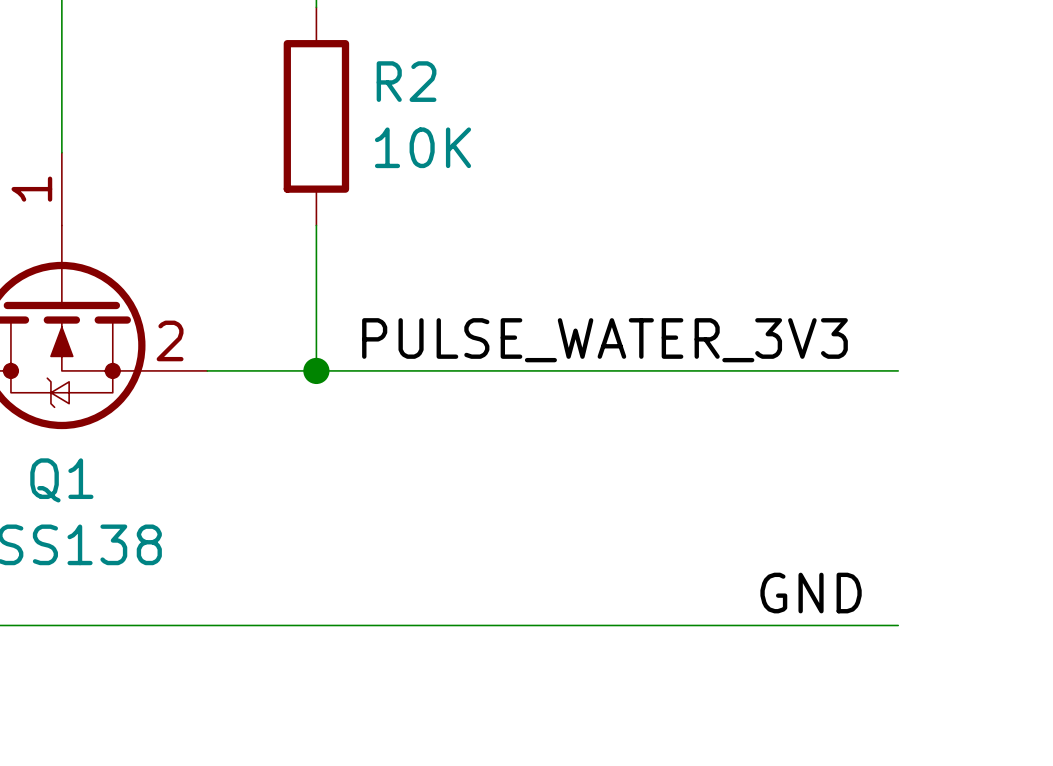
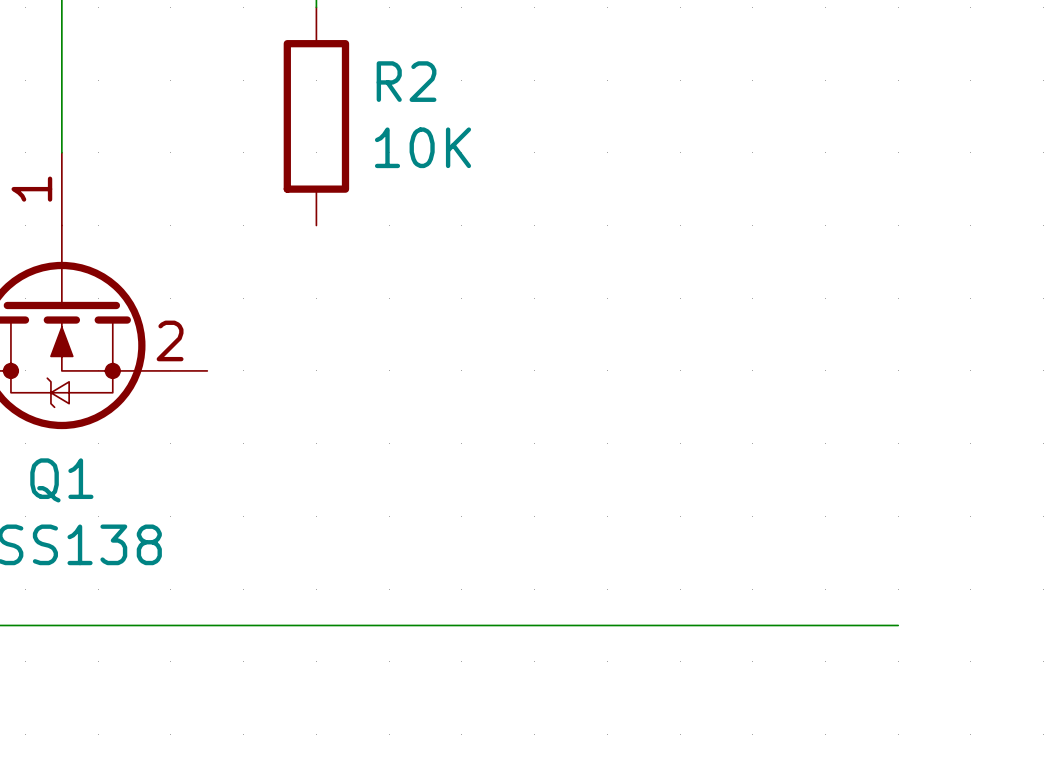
wire: (316, 225) (316, 370) -> none
label: PULSE_WATER_3V3 (604, 340) -> none
wire: (207, 370) (898, 370) -> none
junction: (316, 370) -> none
label: GND (811, 593) -> none

